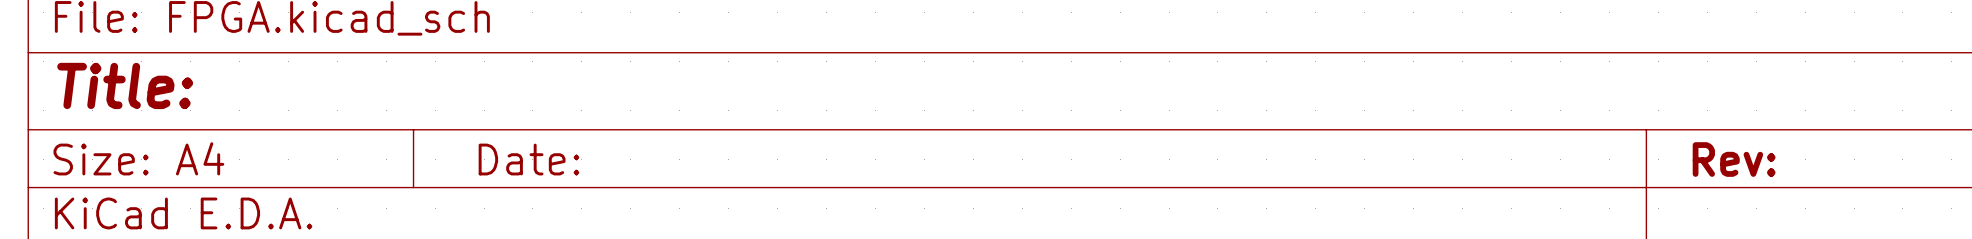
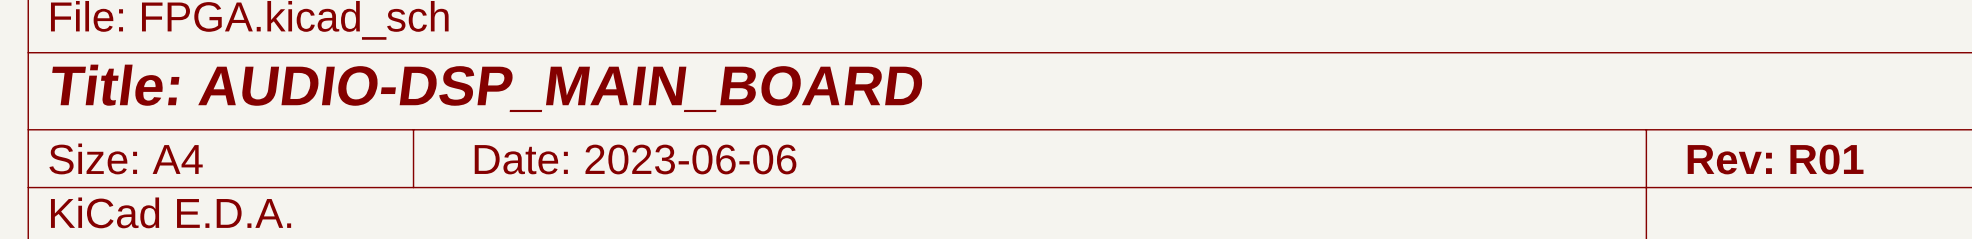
title block: Title: (125, 85) -> Title: AUDIO-DSP_MAIN_BOARD (487, 88)
title block: Date: (528, 159) -> Date: 2023-06-06 (635, 159)
title block: Rev: (1734, 159) -> Rev: R01 (1775, 159)

